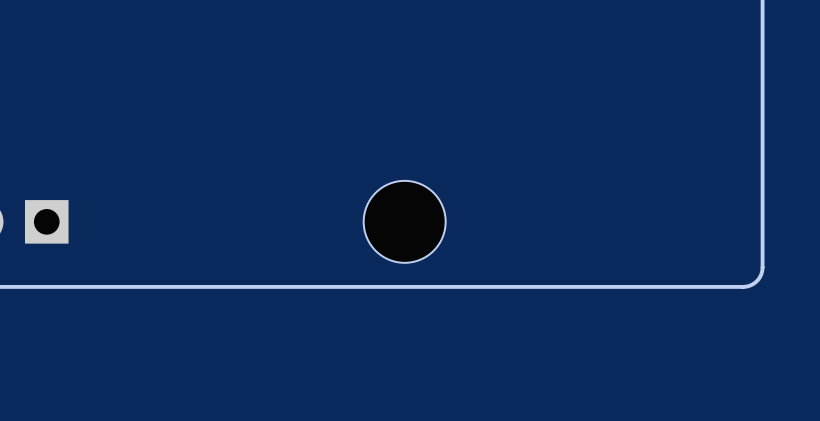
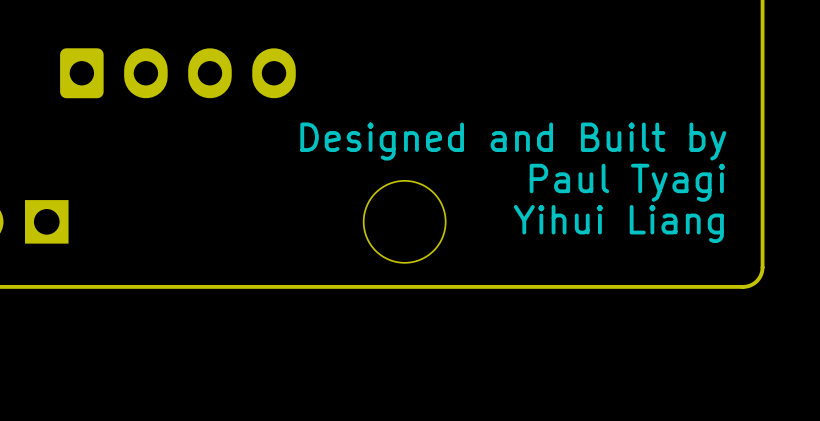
part: none -> (177, 73)
text: none -> Designed and Built by (513, 141)
text: none -> Paul Tyagi (627, 182)
text: none -> Yihui Liang (618, 224)

